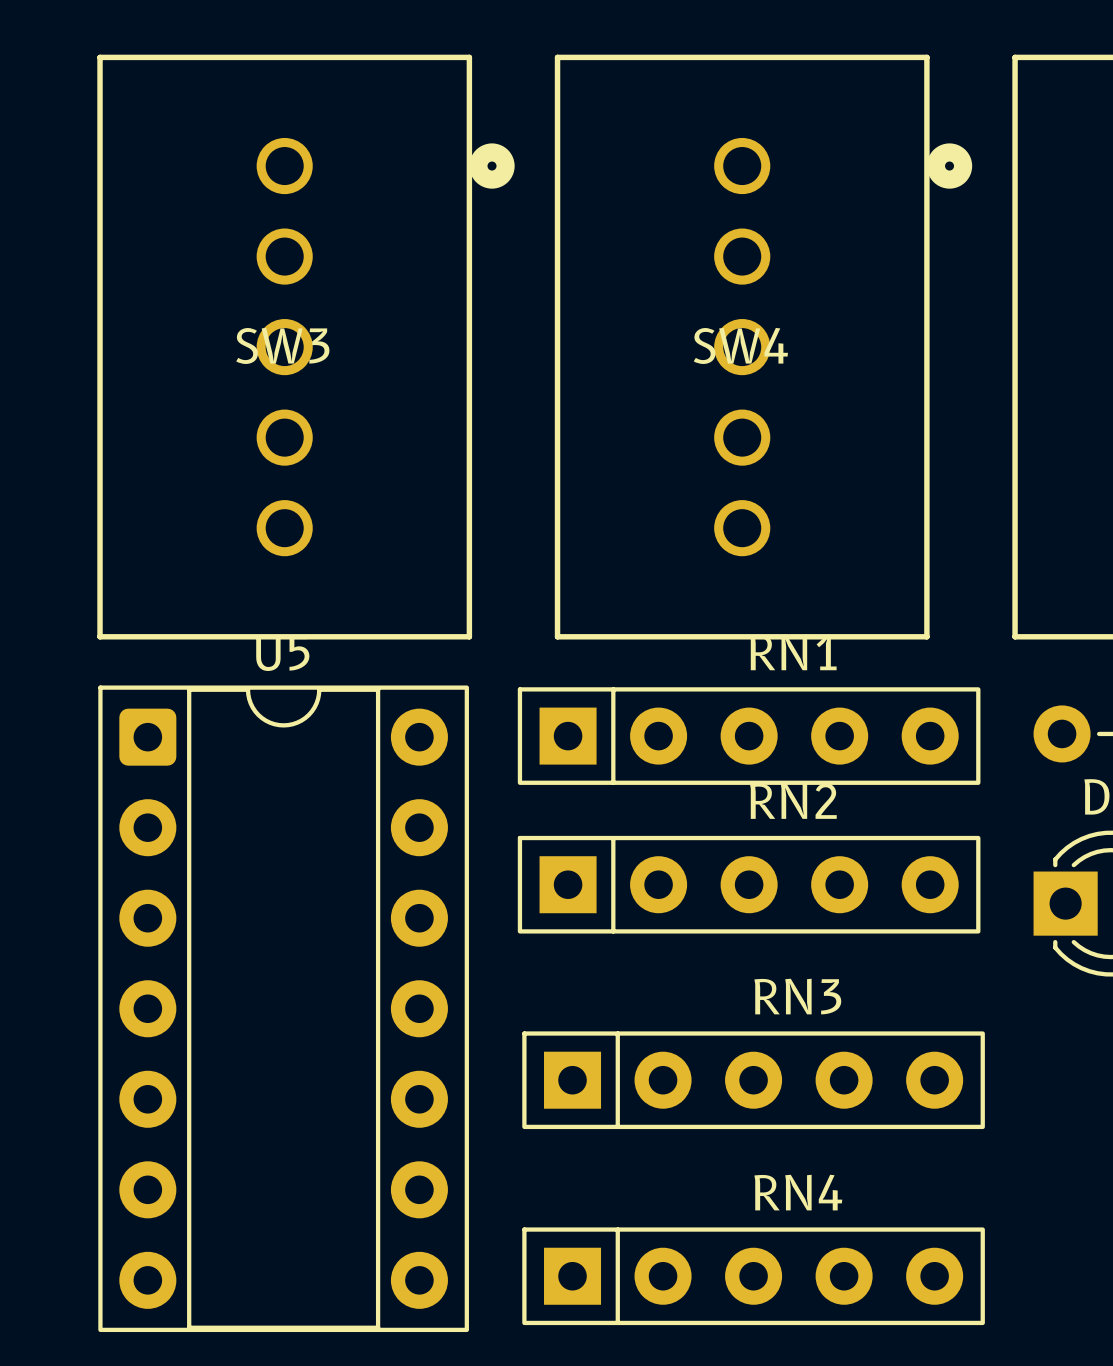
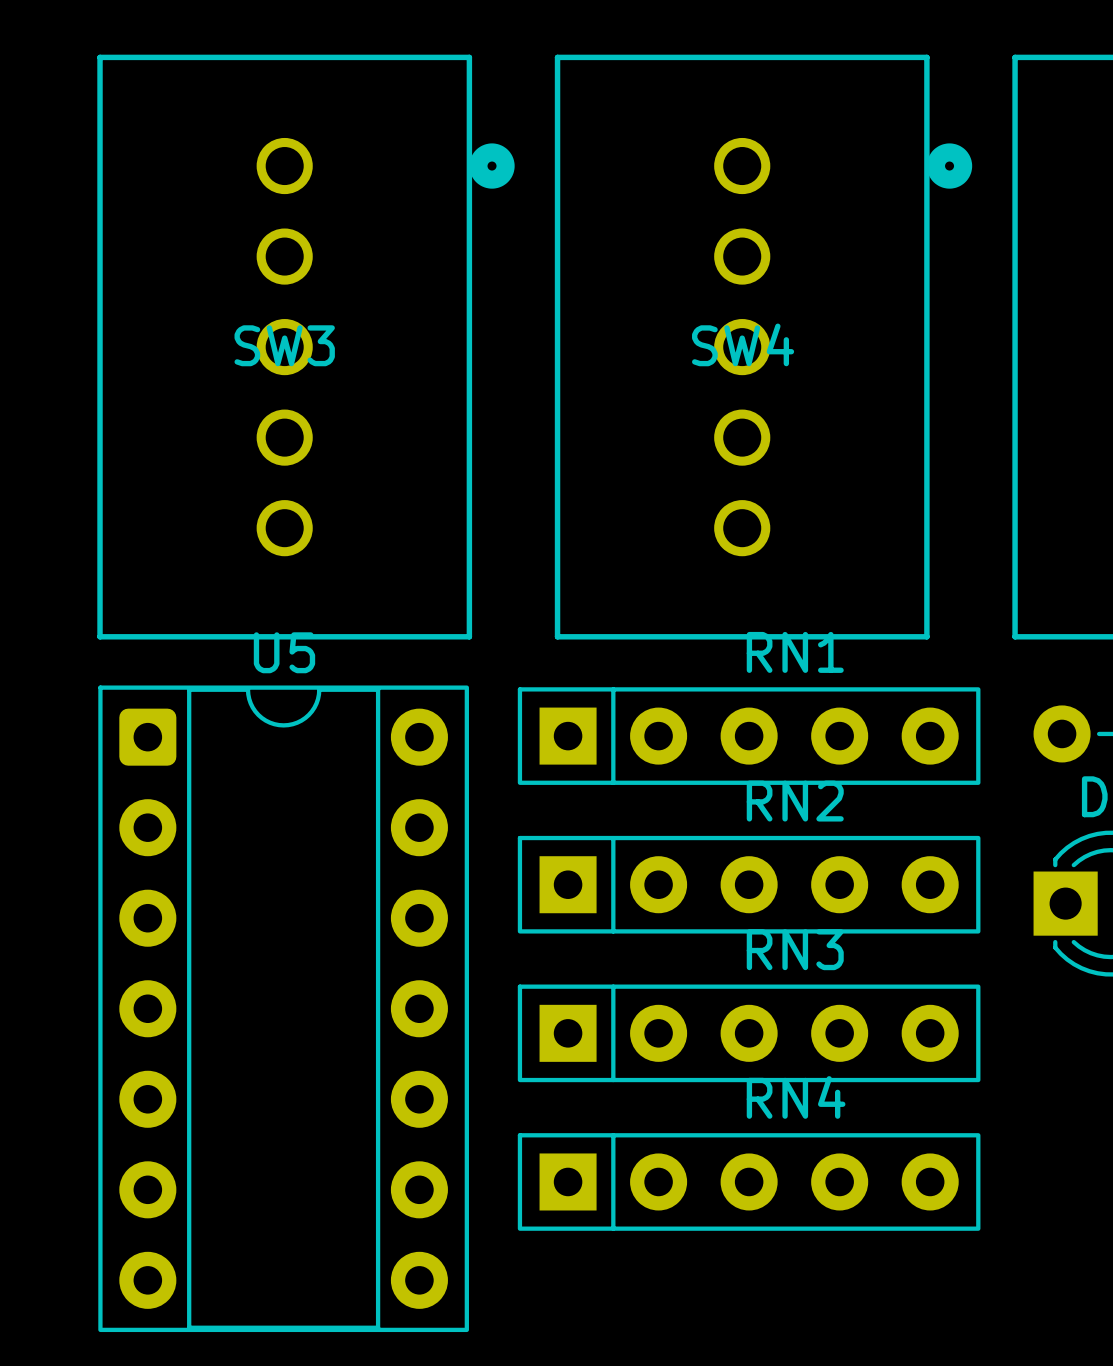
RN3 position: (753, 1080) -> (749, 1033)
RN4 position: (753, 1276) -> (749, 1181)

